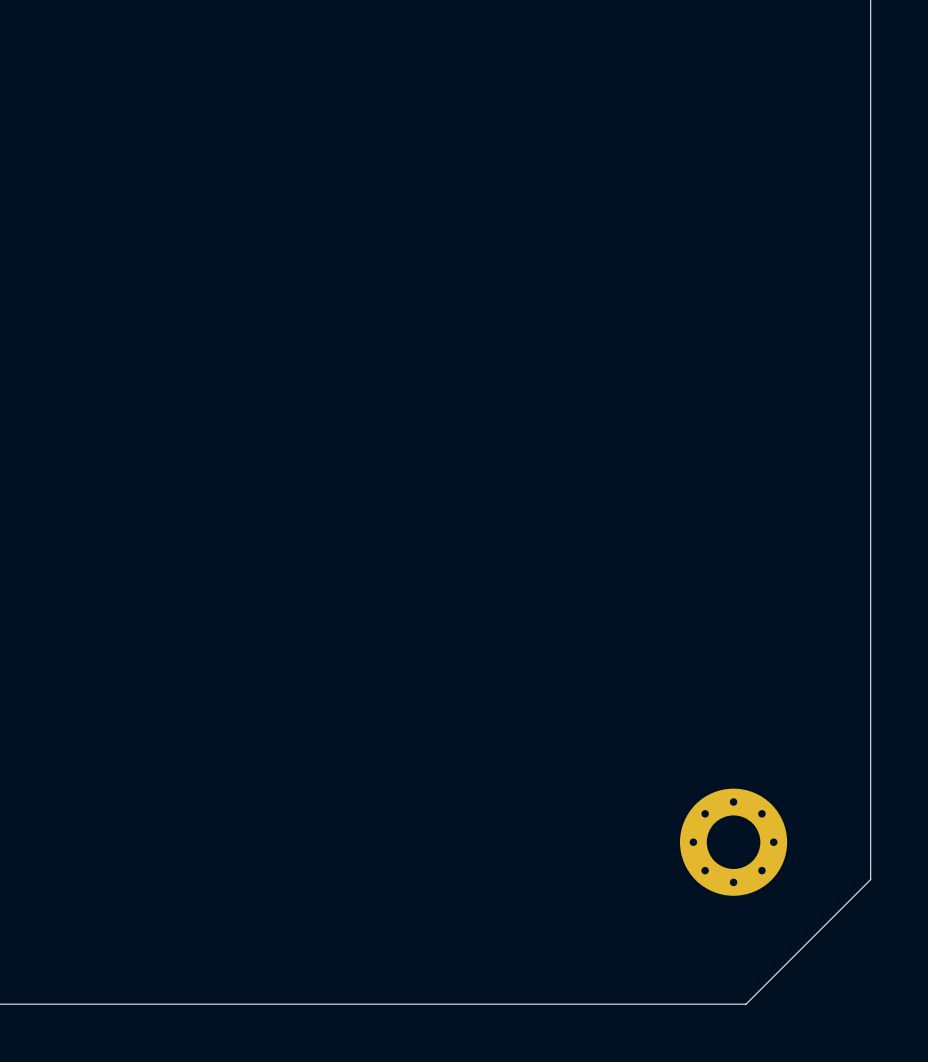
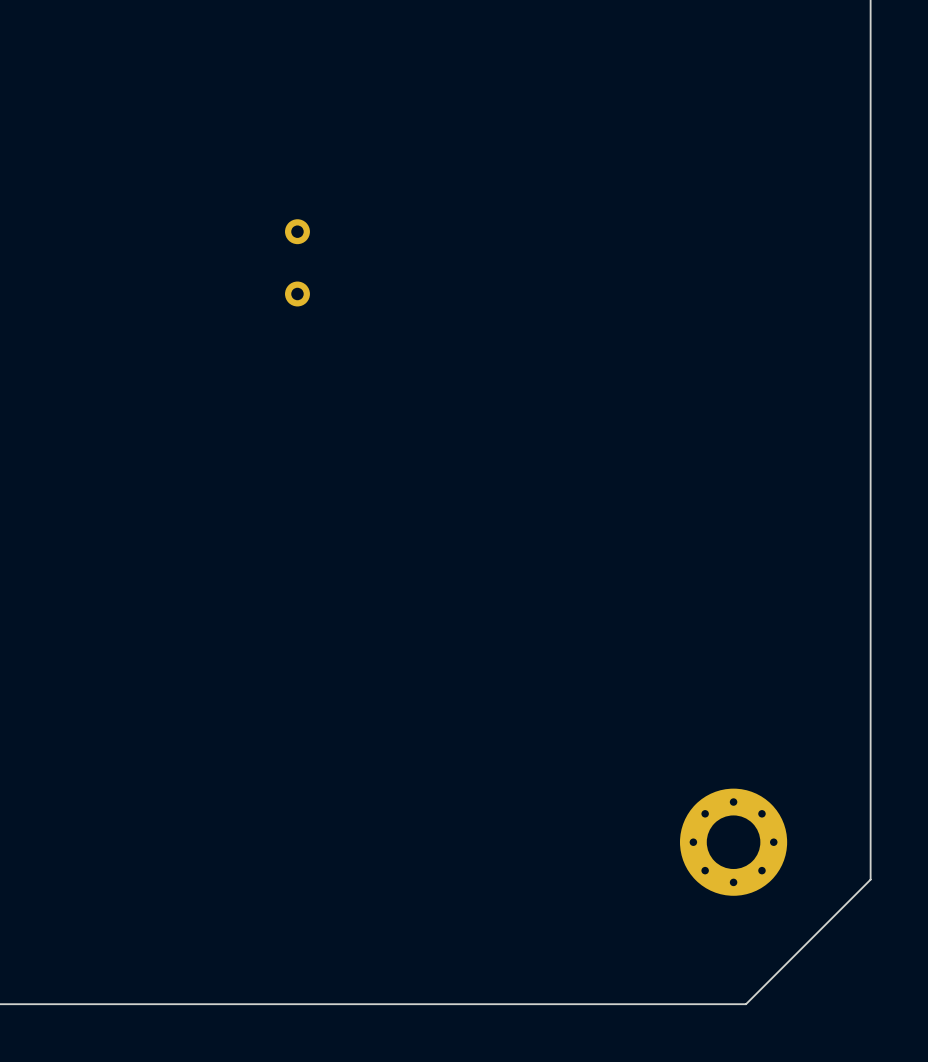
part: none -> (297, 231)
part: none -> (297, 293)

